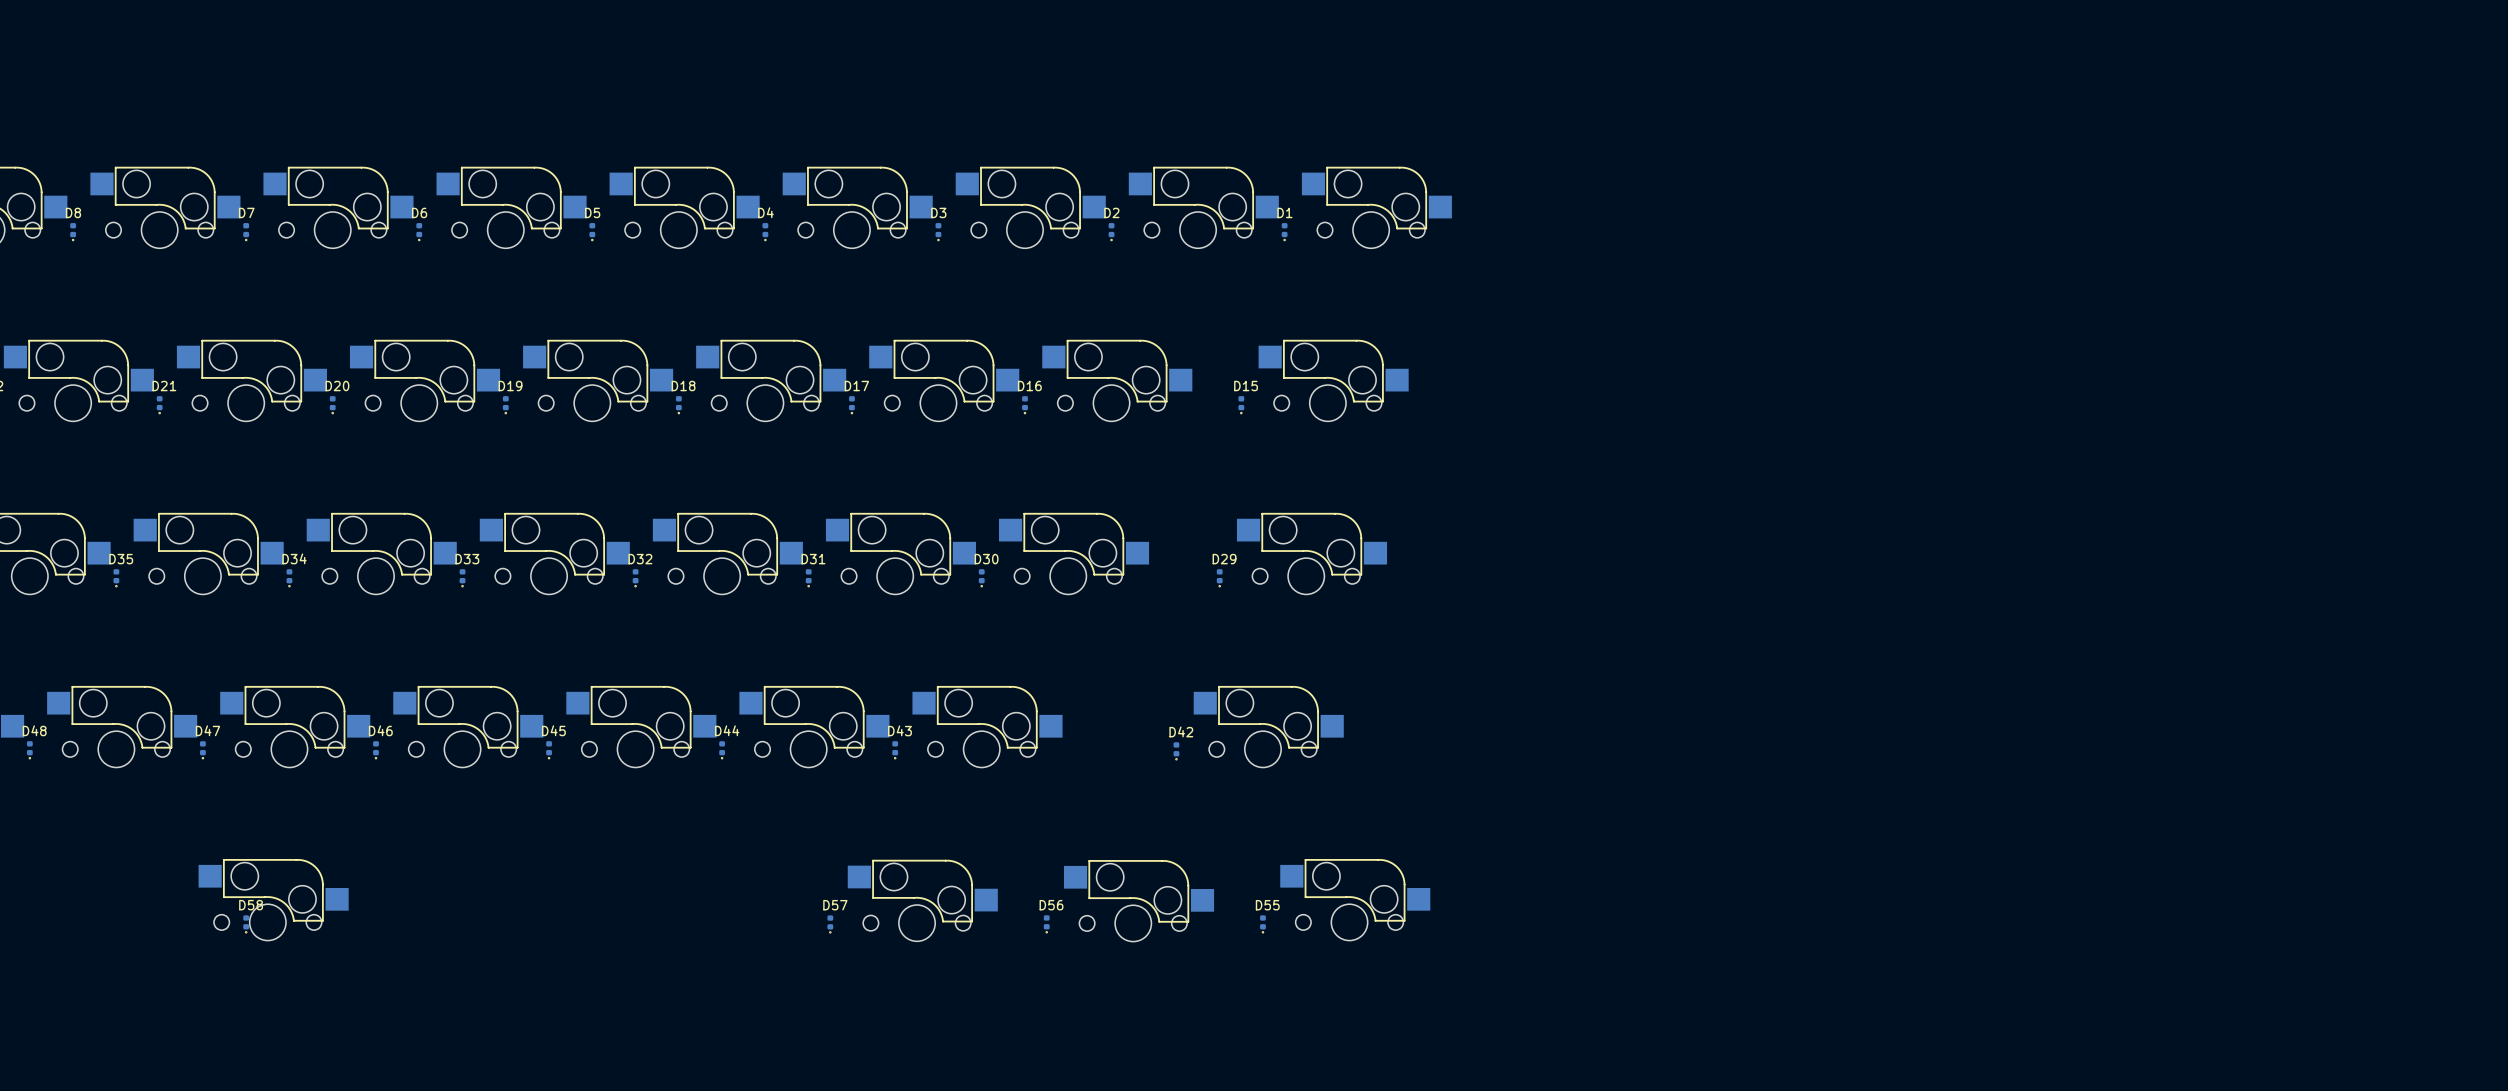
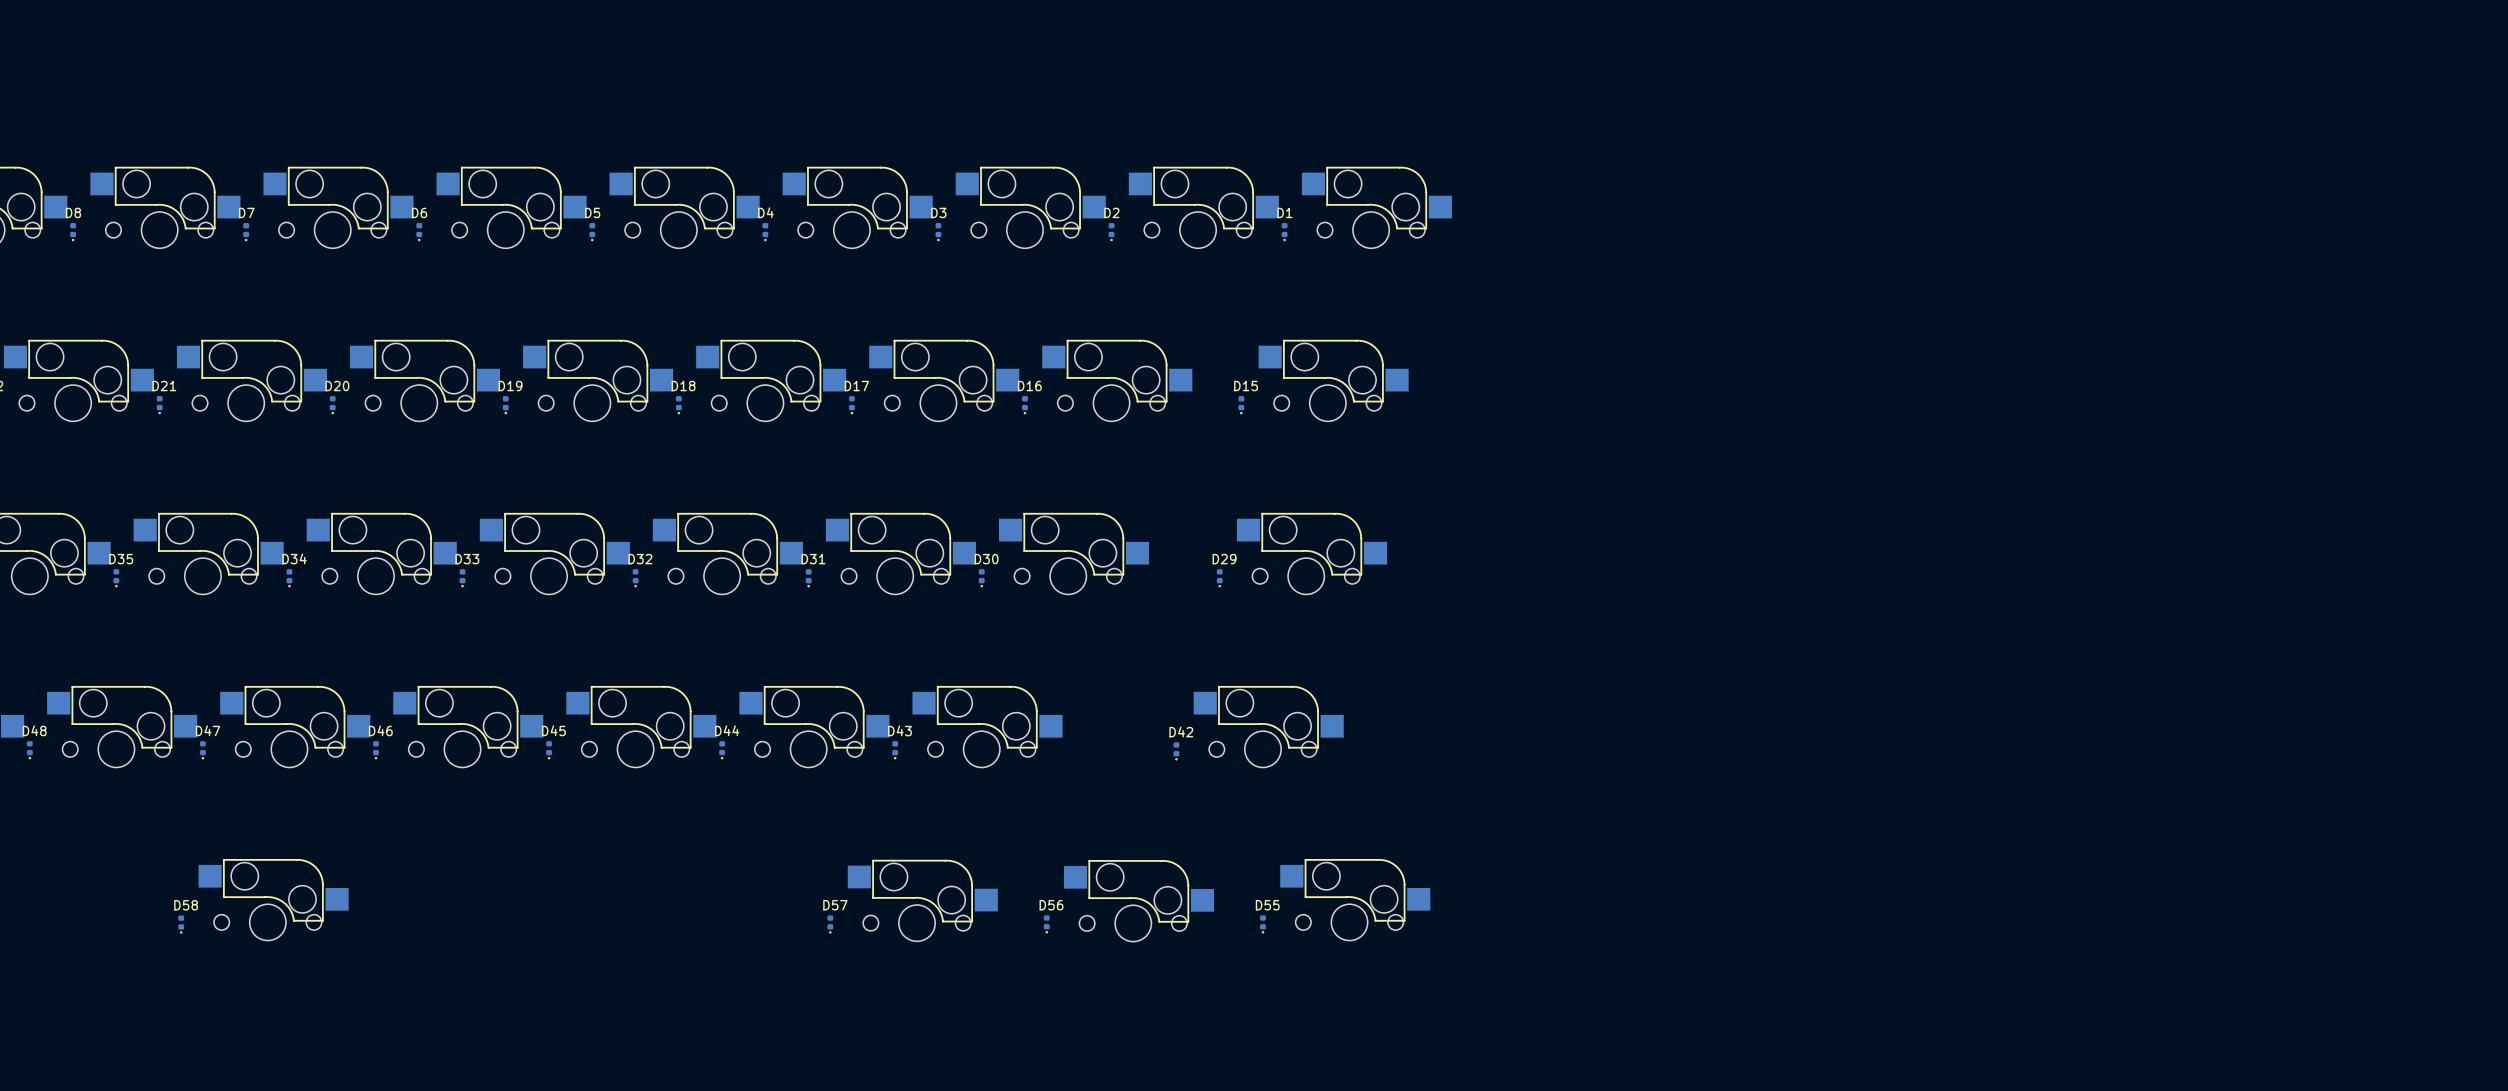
D58 position: (246, 924) -> (181, 924)

